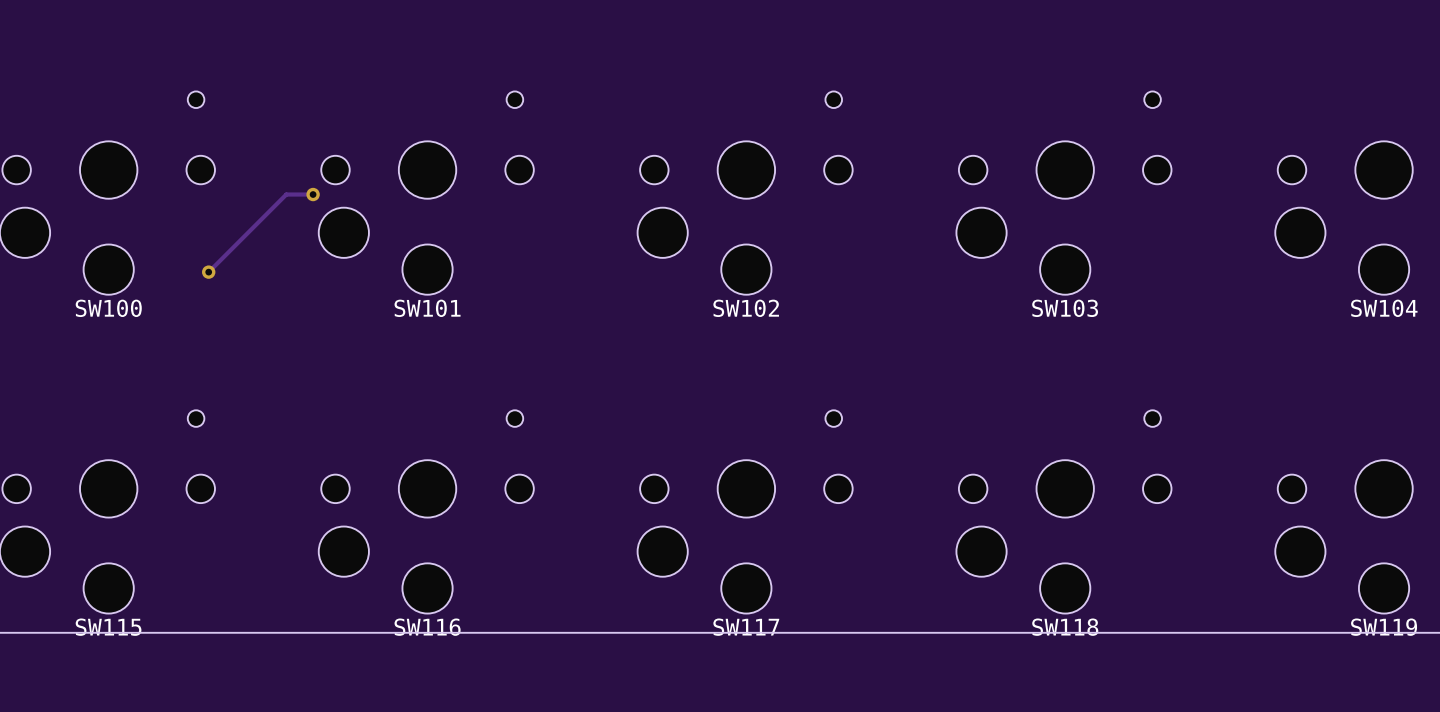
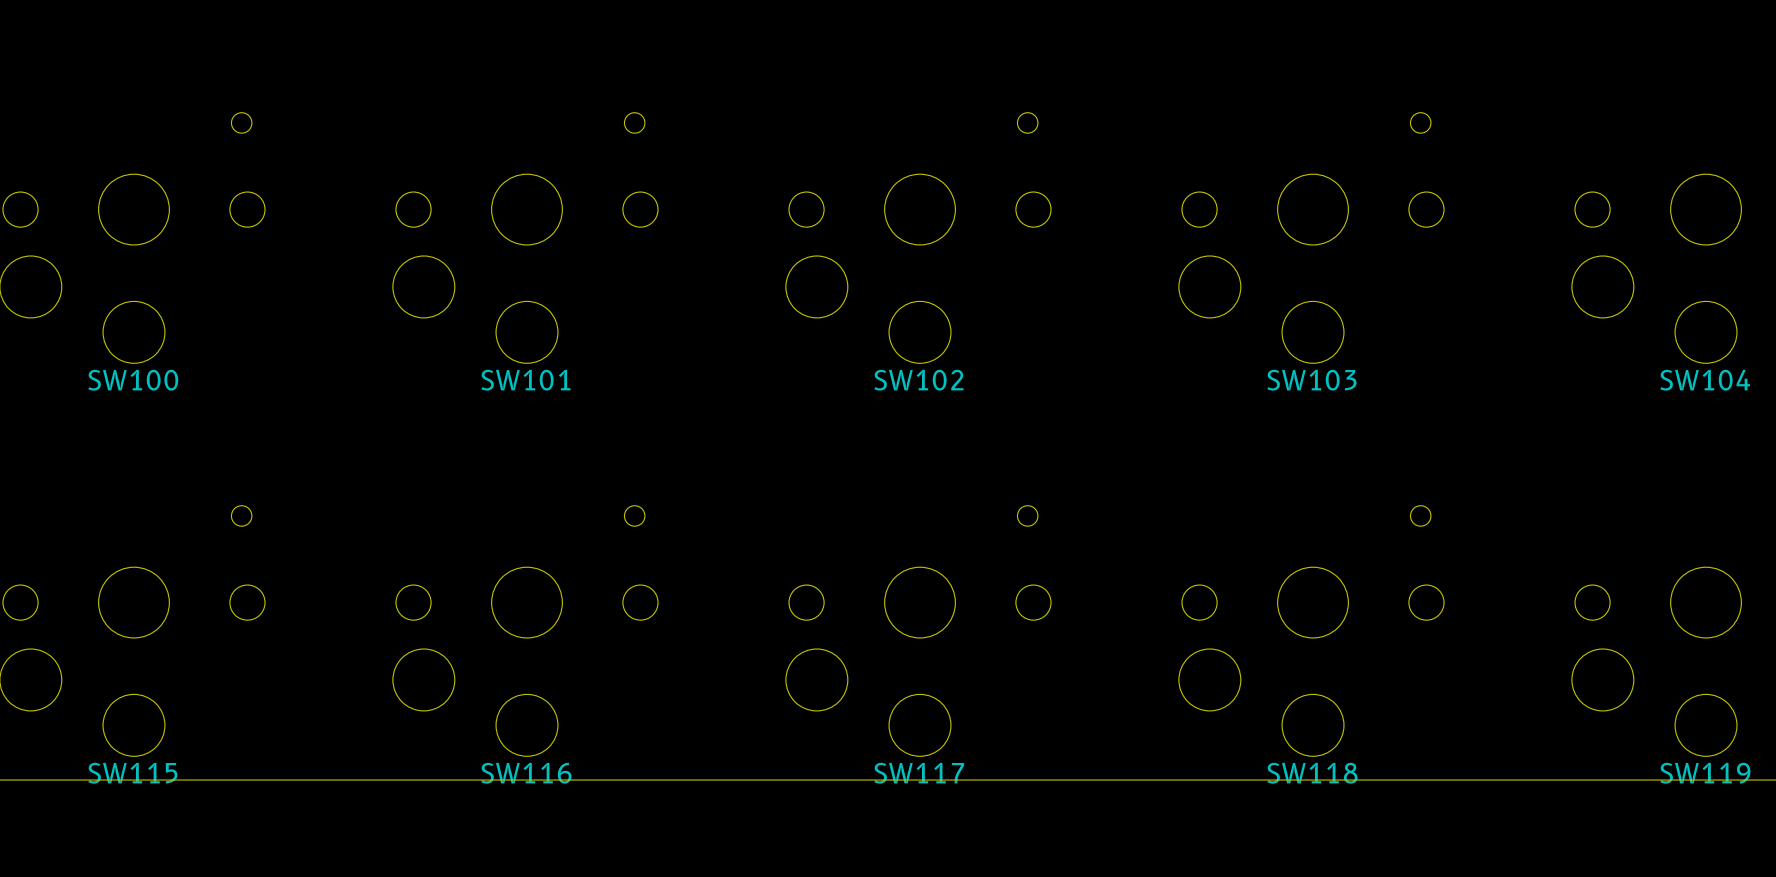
track: (313, 194) (286, 194) (208, 272) -> none
via: (313, 194) -> none
via: (208, 272) -> none

